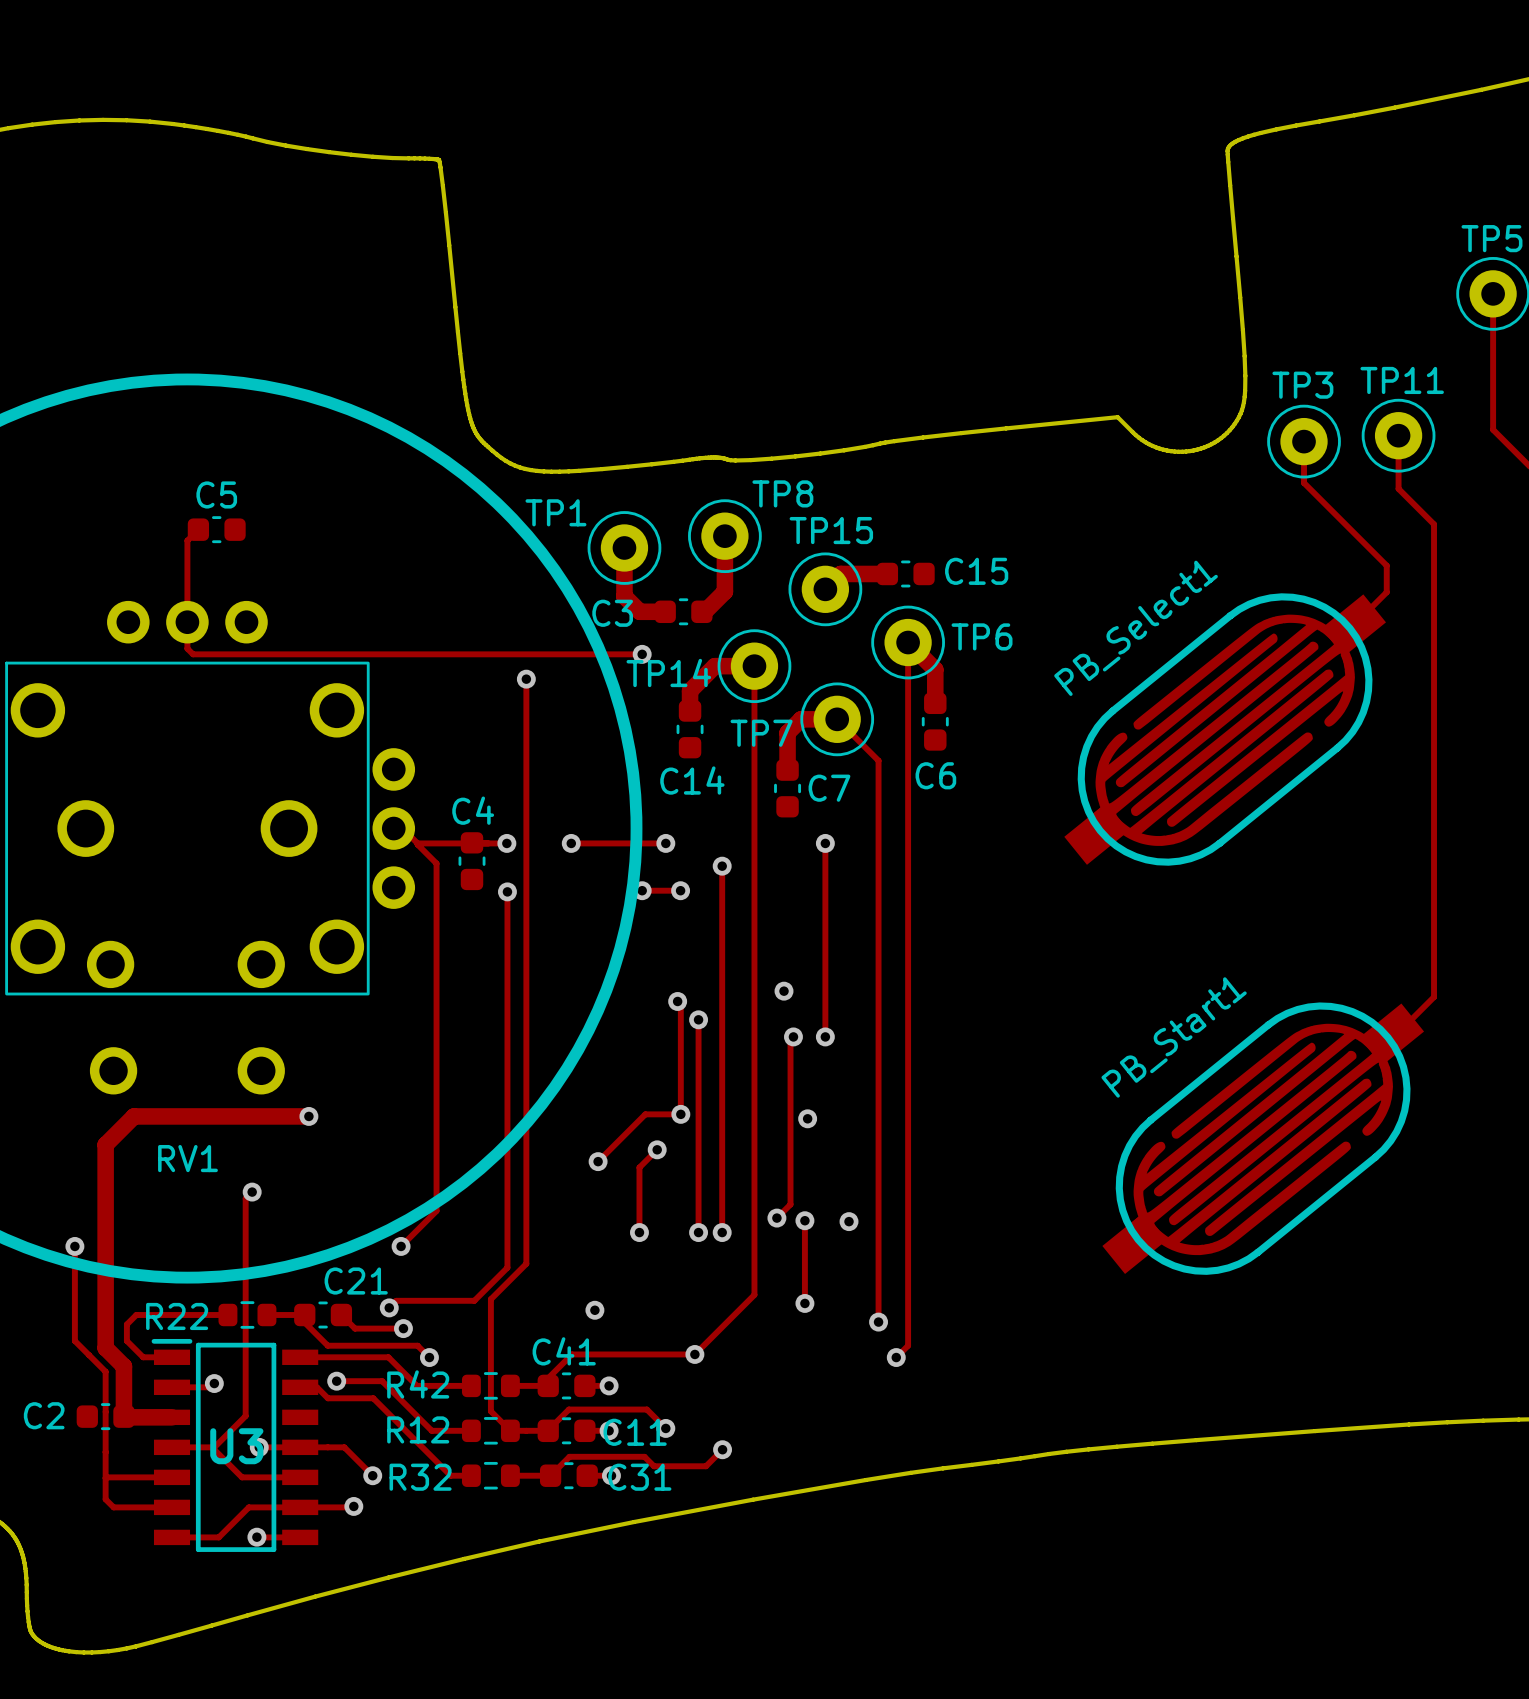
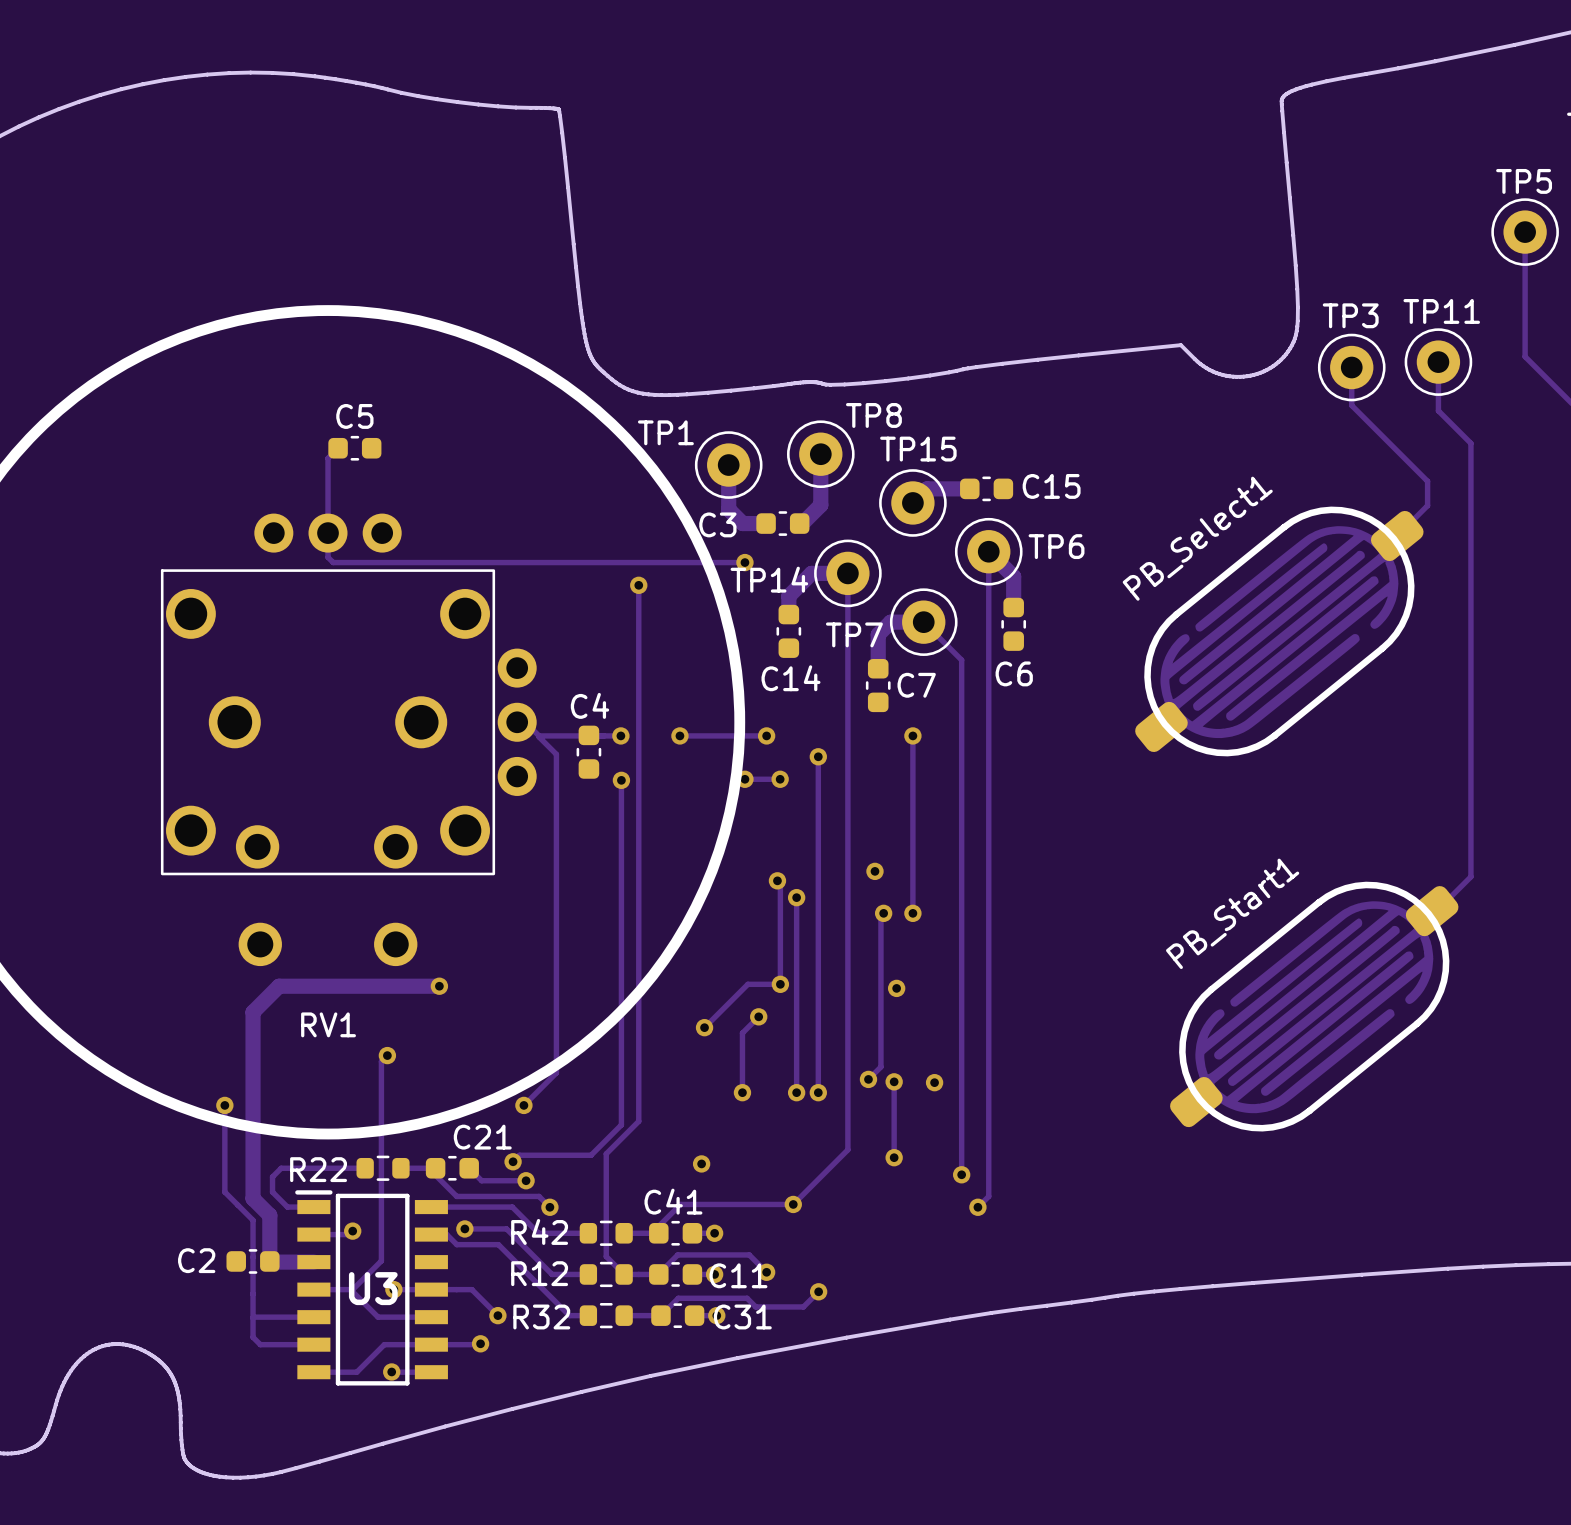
PB_Select1 footprint: [1064, 593, 1386, 866] -> [1135, 506, 1424, 757]
PB_Start1 footprint: [1102, 1002, 1425, 1275] -> [1170, 881, 1459, 1132]

